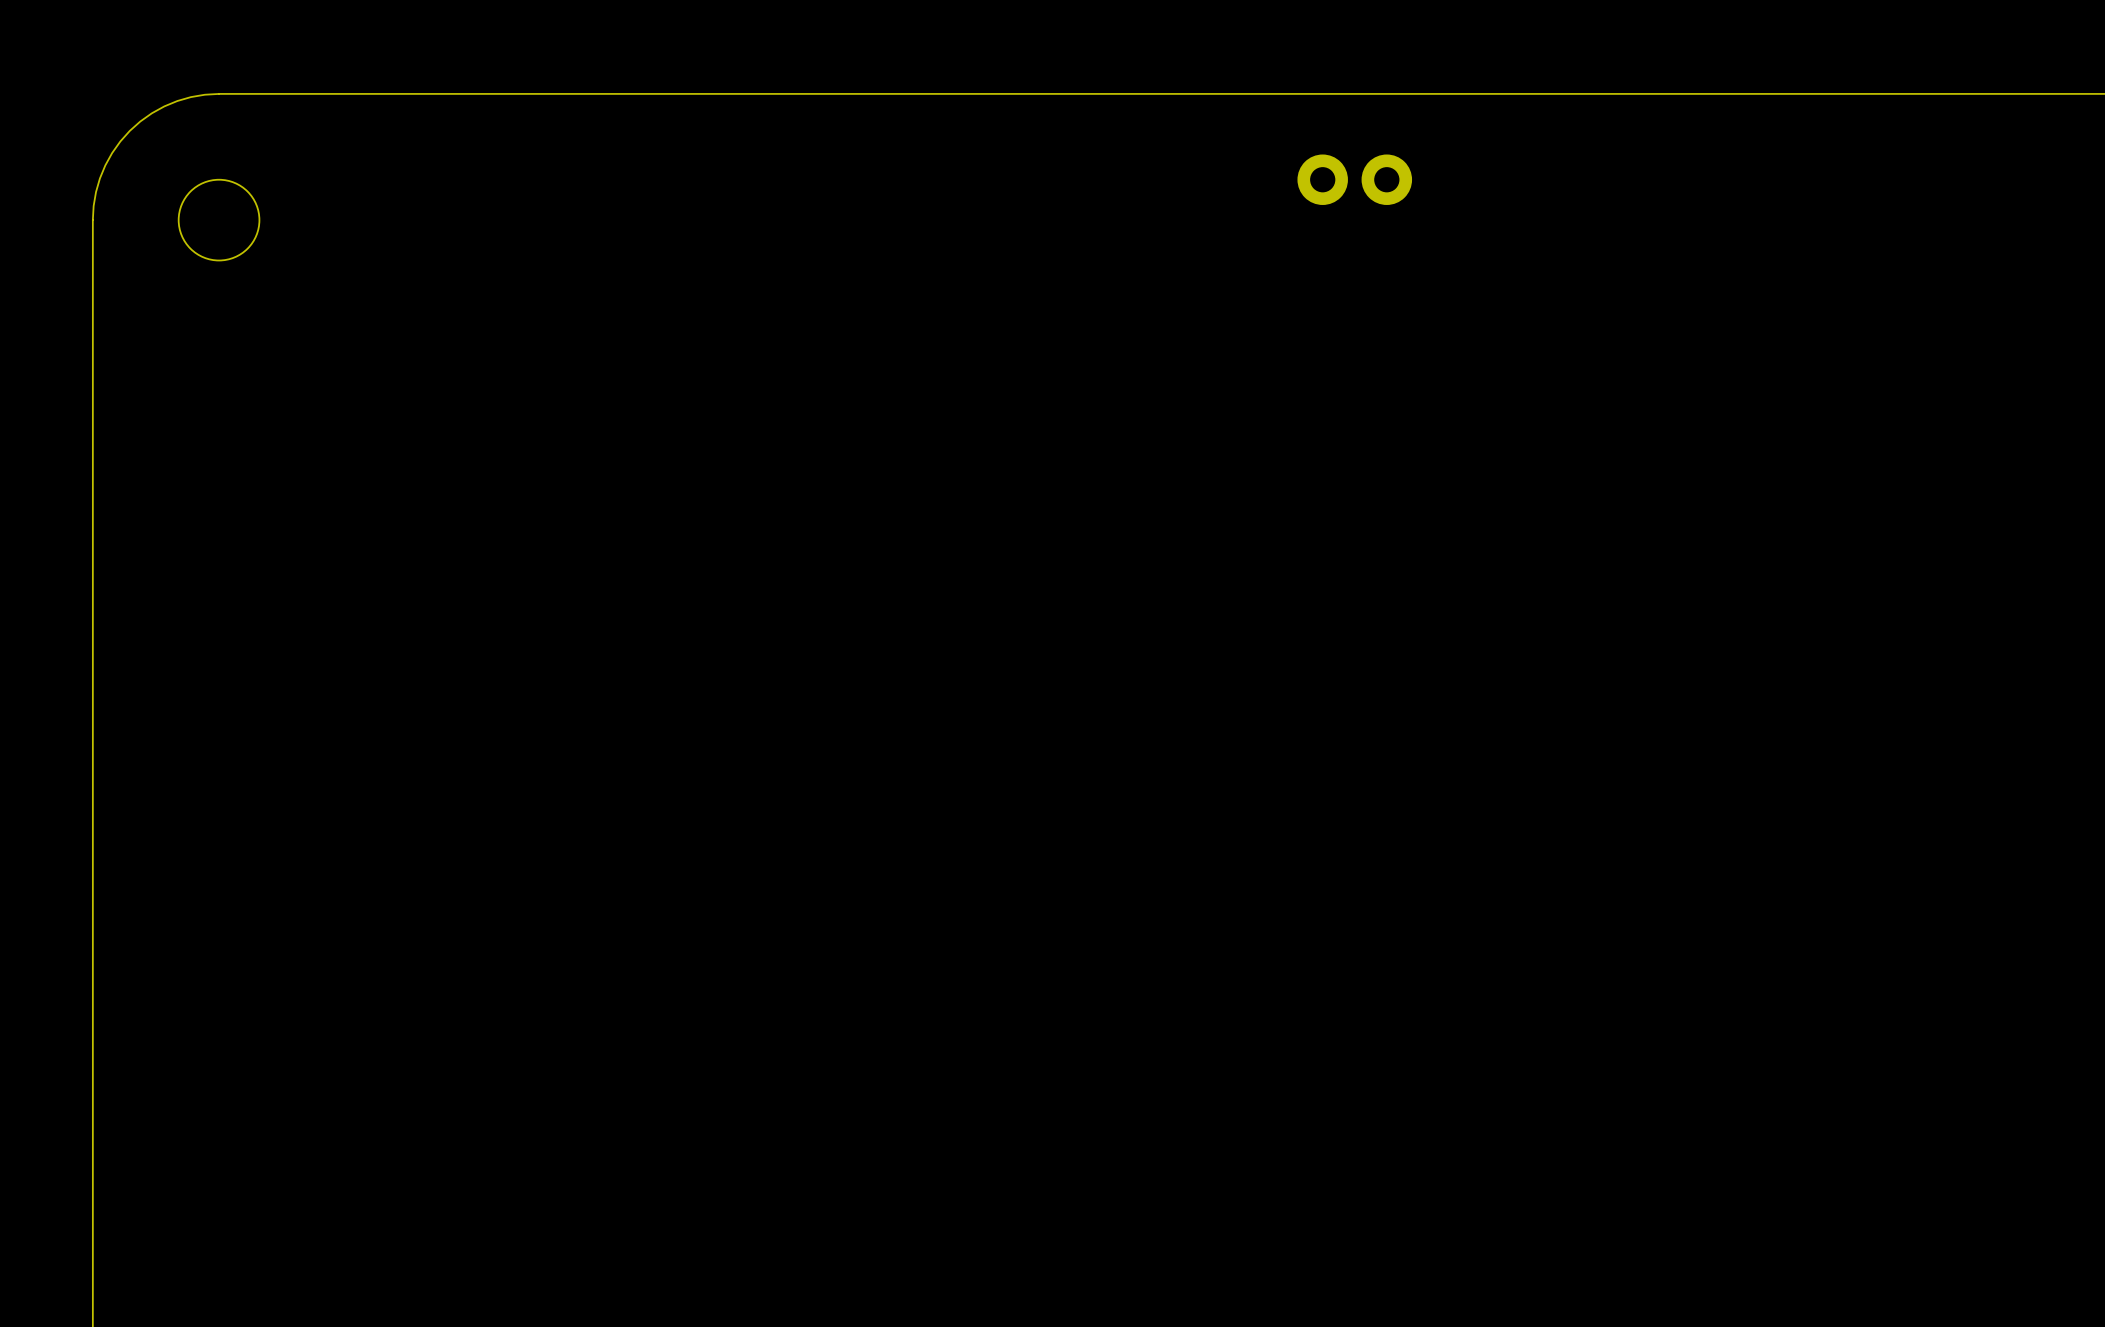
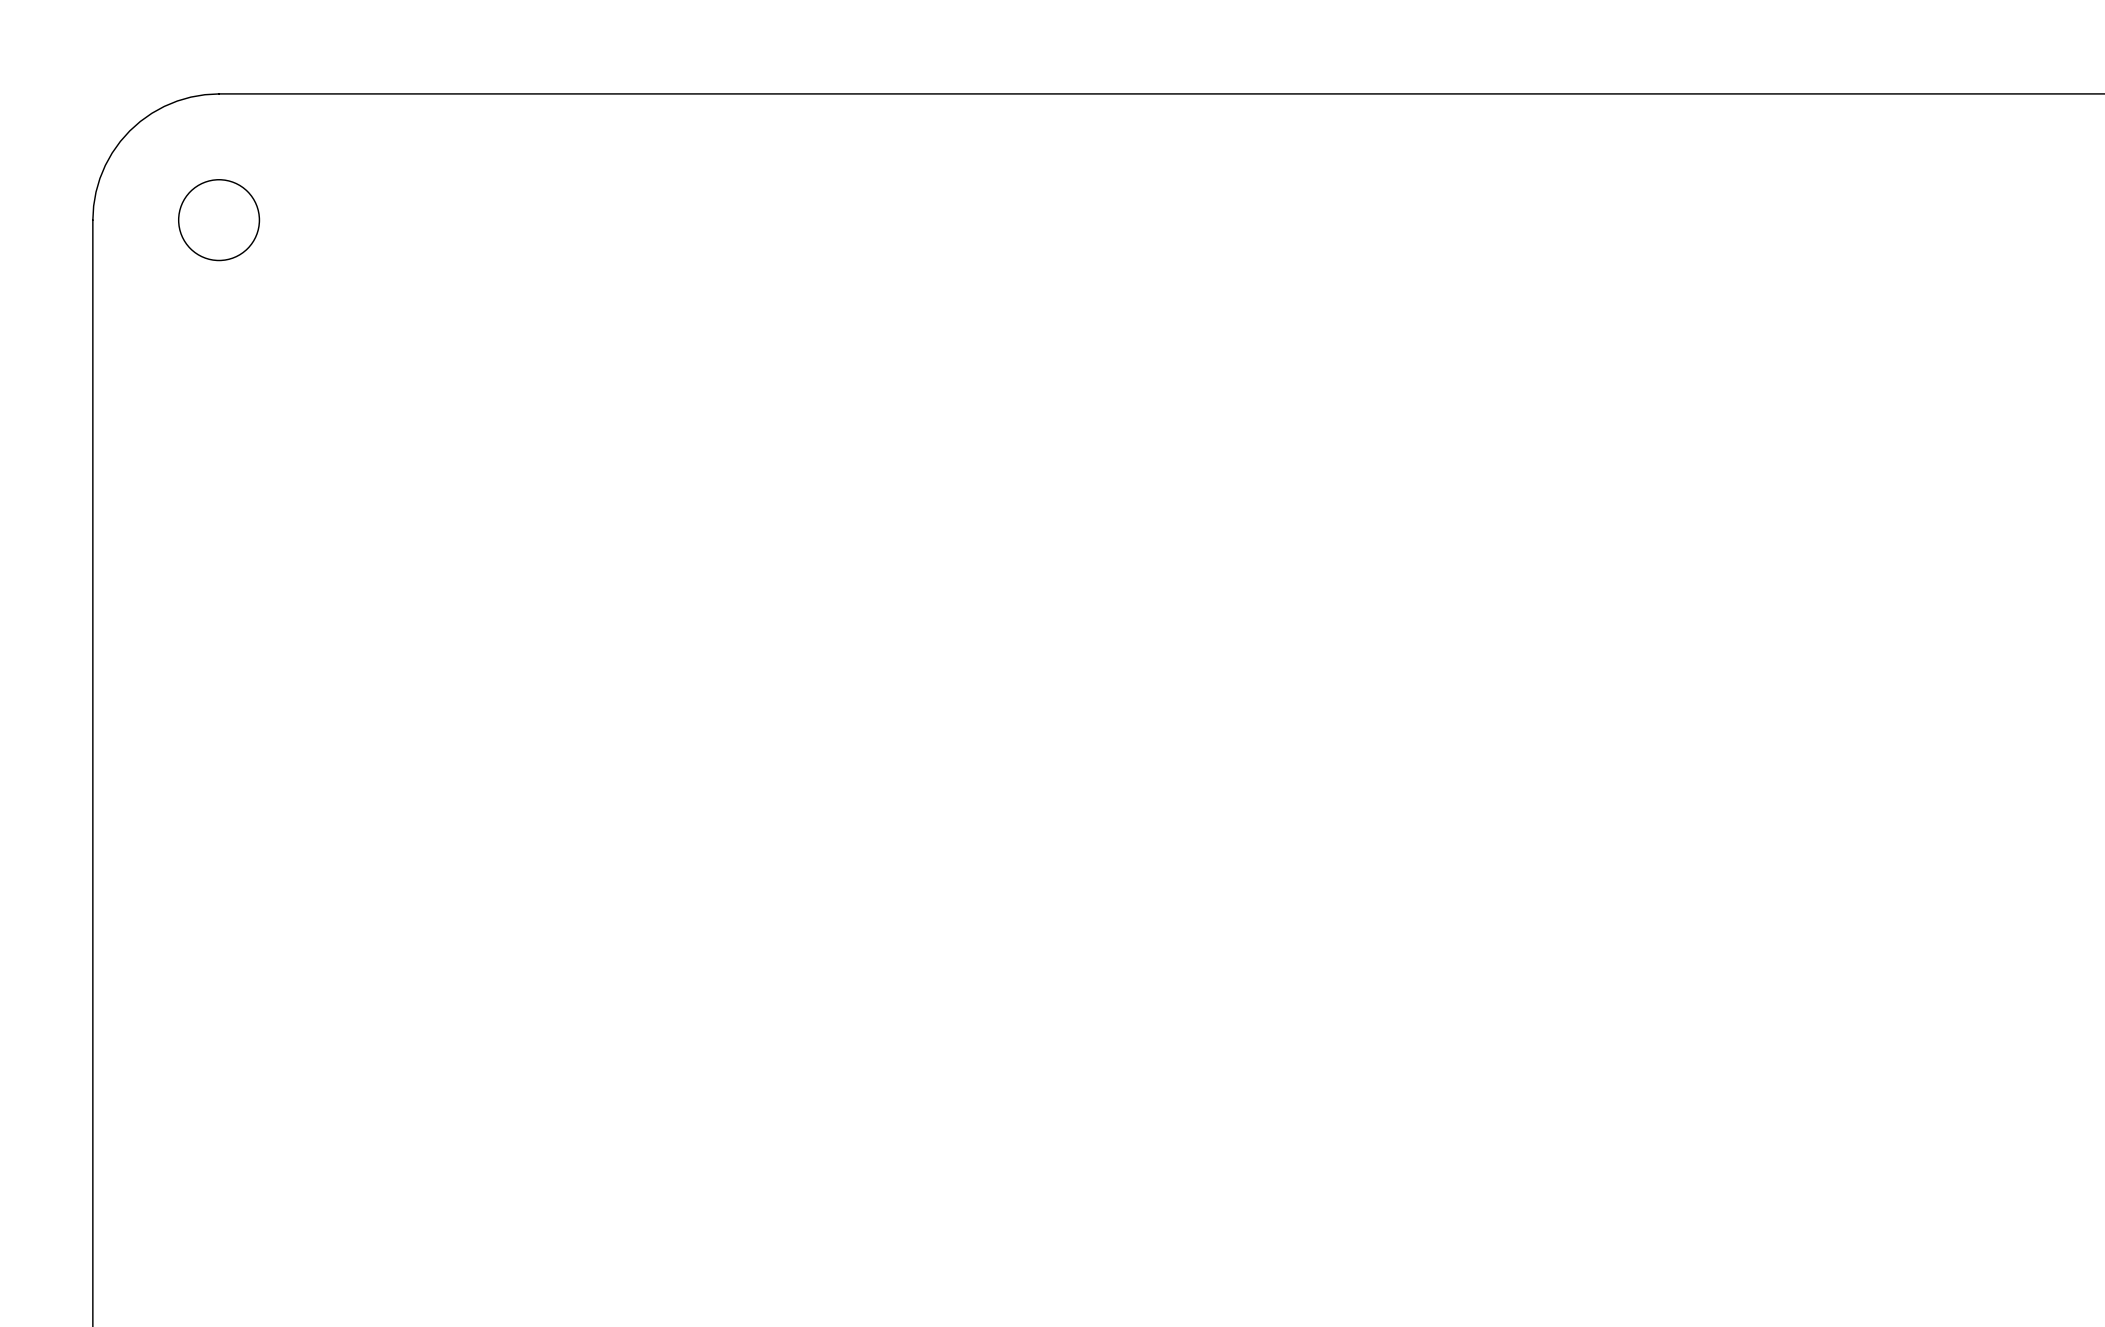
part: (1354, 179) -> none

